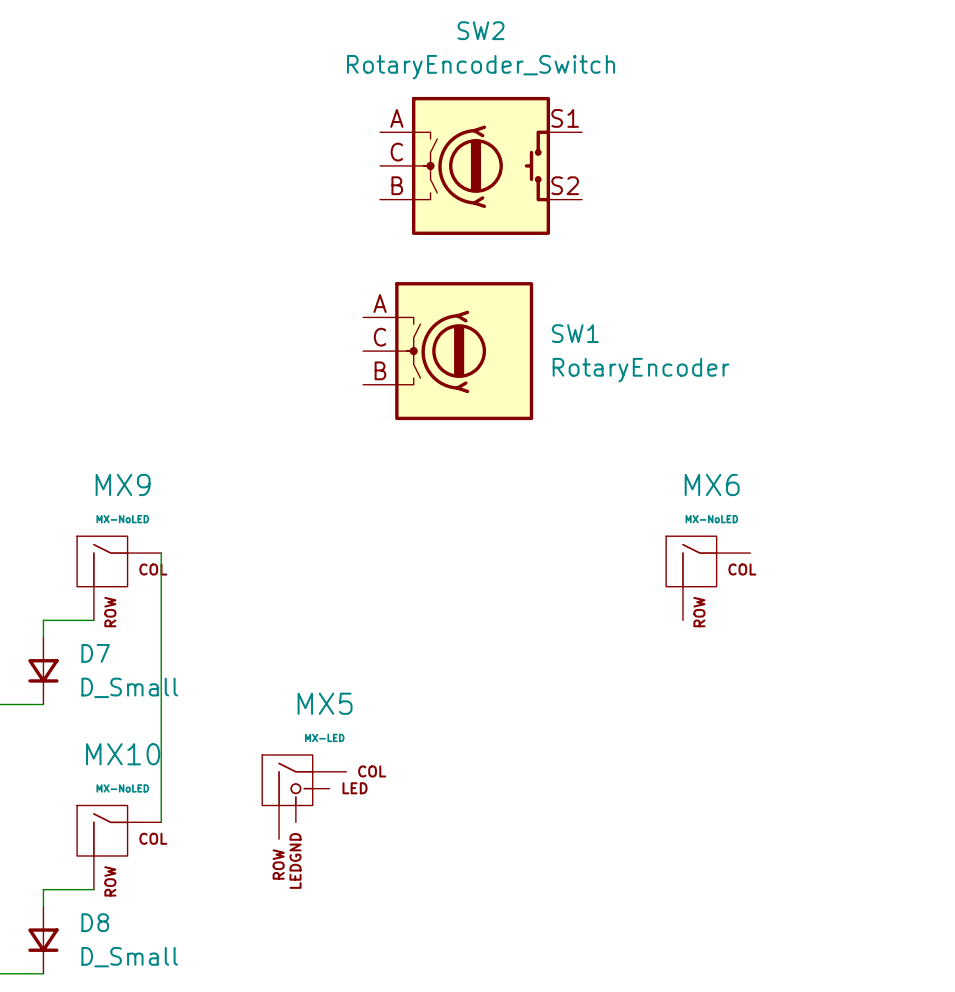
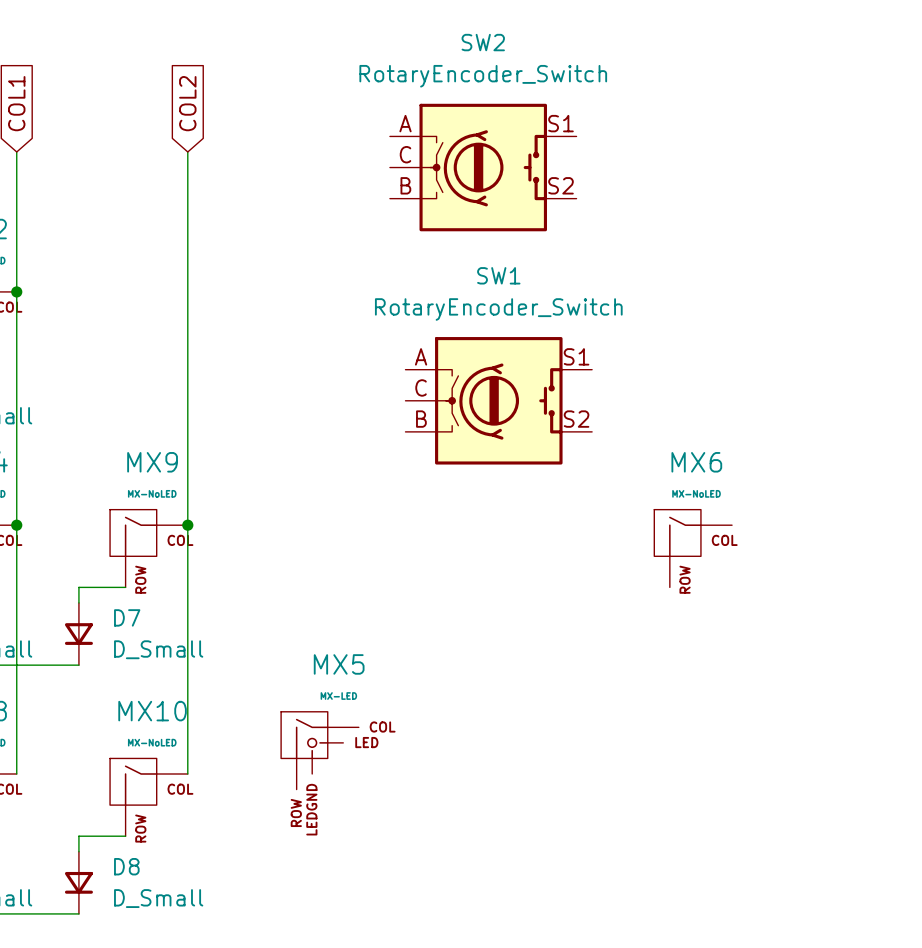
global label: none -> COL2 (187, 103)
wire: none -> (187, 151) (187, 525)
SW1 symbol: [363, 282, 534, 421] -> [405, 337, 593, 465]
SW1 name position: SW1 (575, 333) -> SW1 (498, 275)
SW1 value: RotaryEncoder (641, 370) -> RotaryEncoder_Switch (498, 309)
junction: none -> (187, 525)

